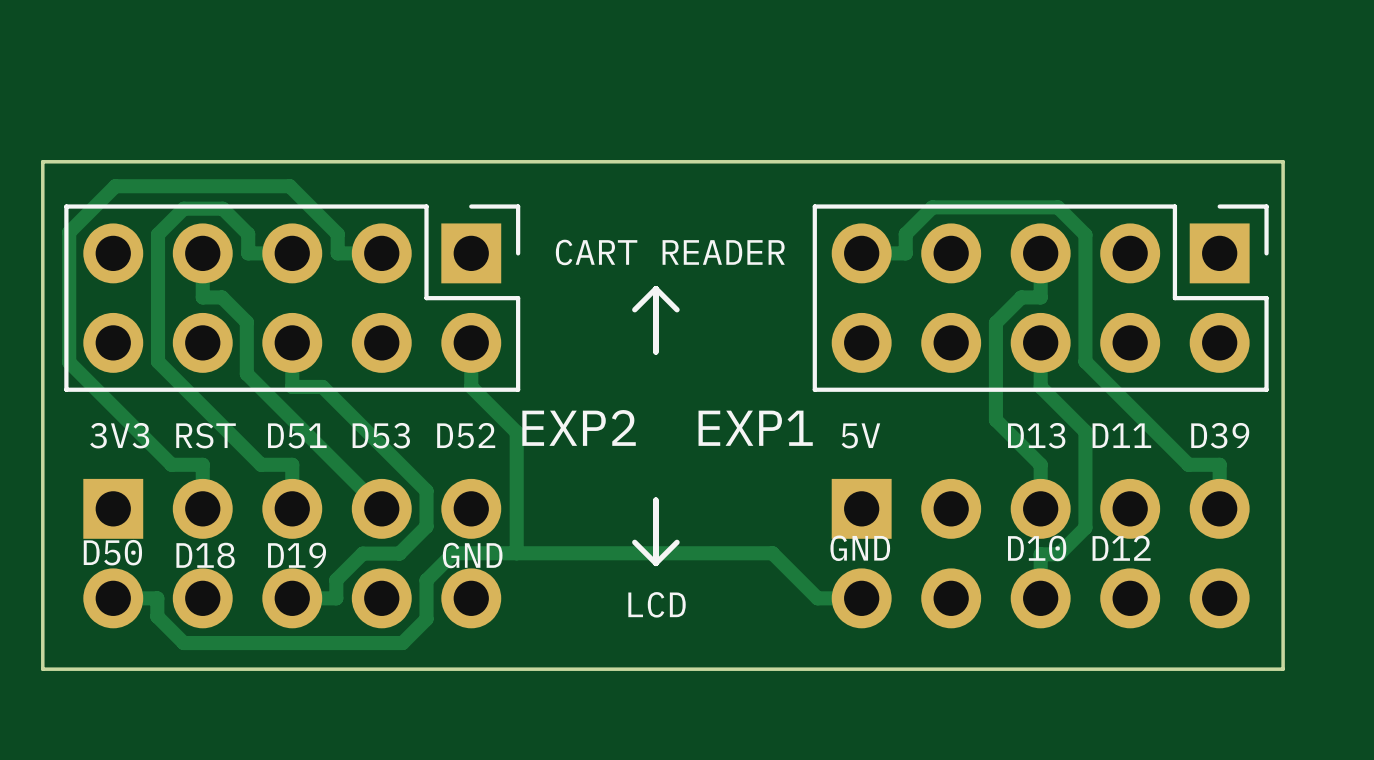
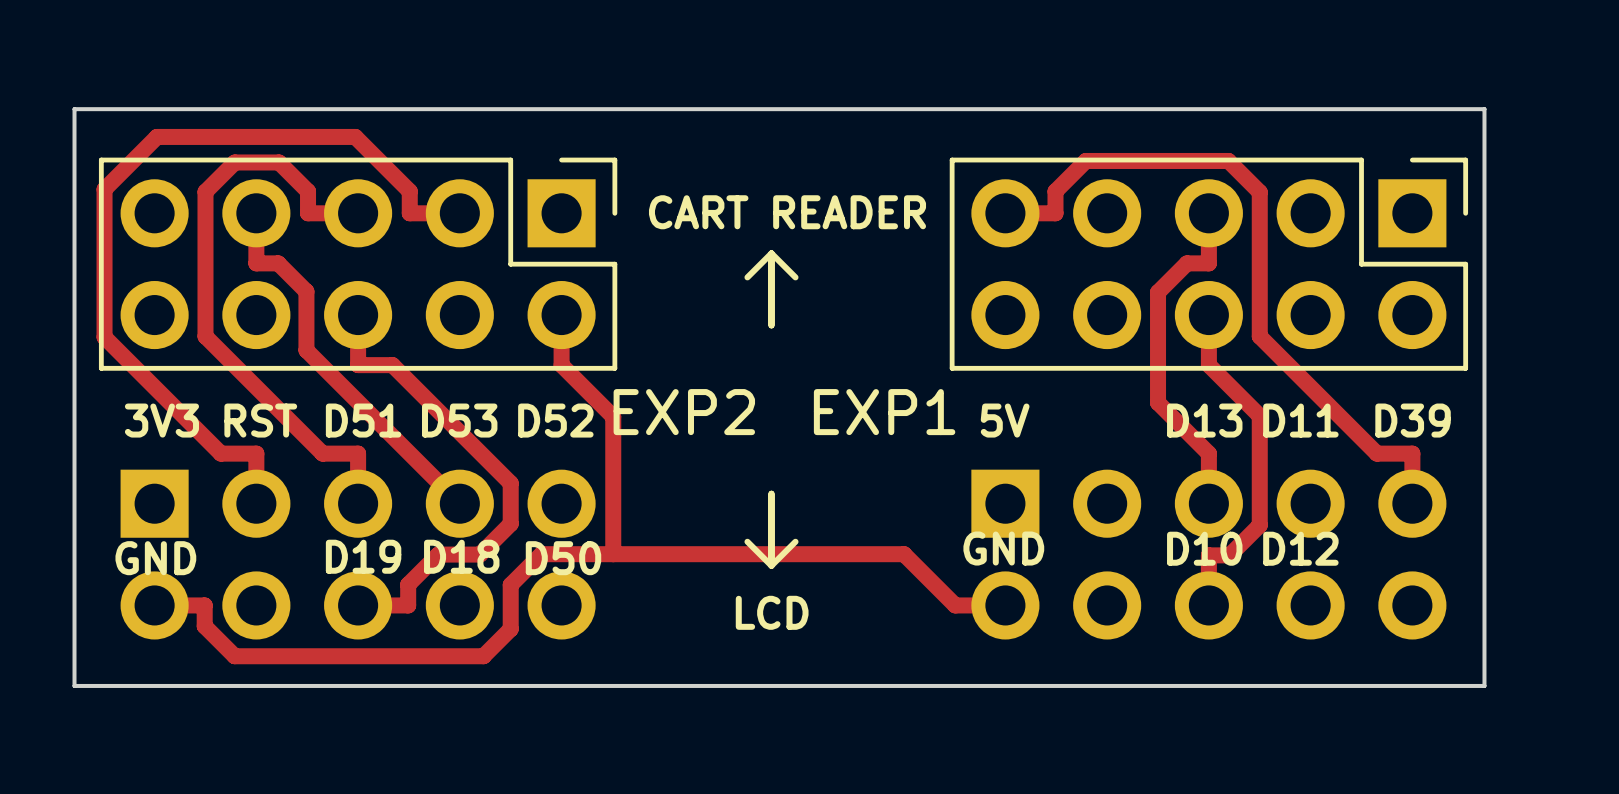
text: D50 (112, 552) -> GND (155, 558)
text position: D18 (205, 555) -> D18 (461, 556)
text: GND (472, 555) -> D50 (563, 558)

